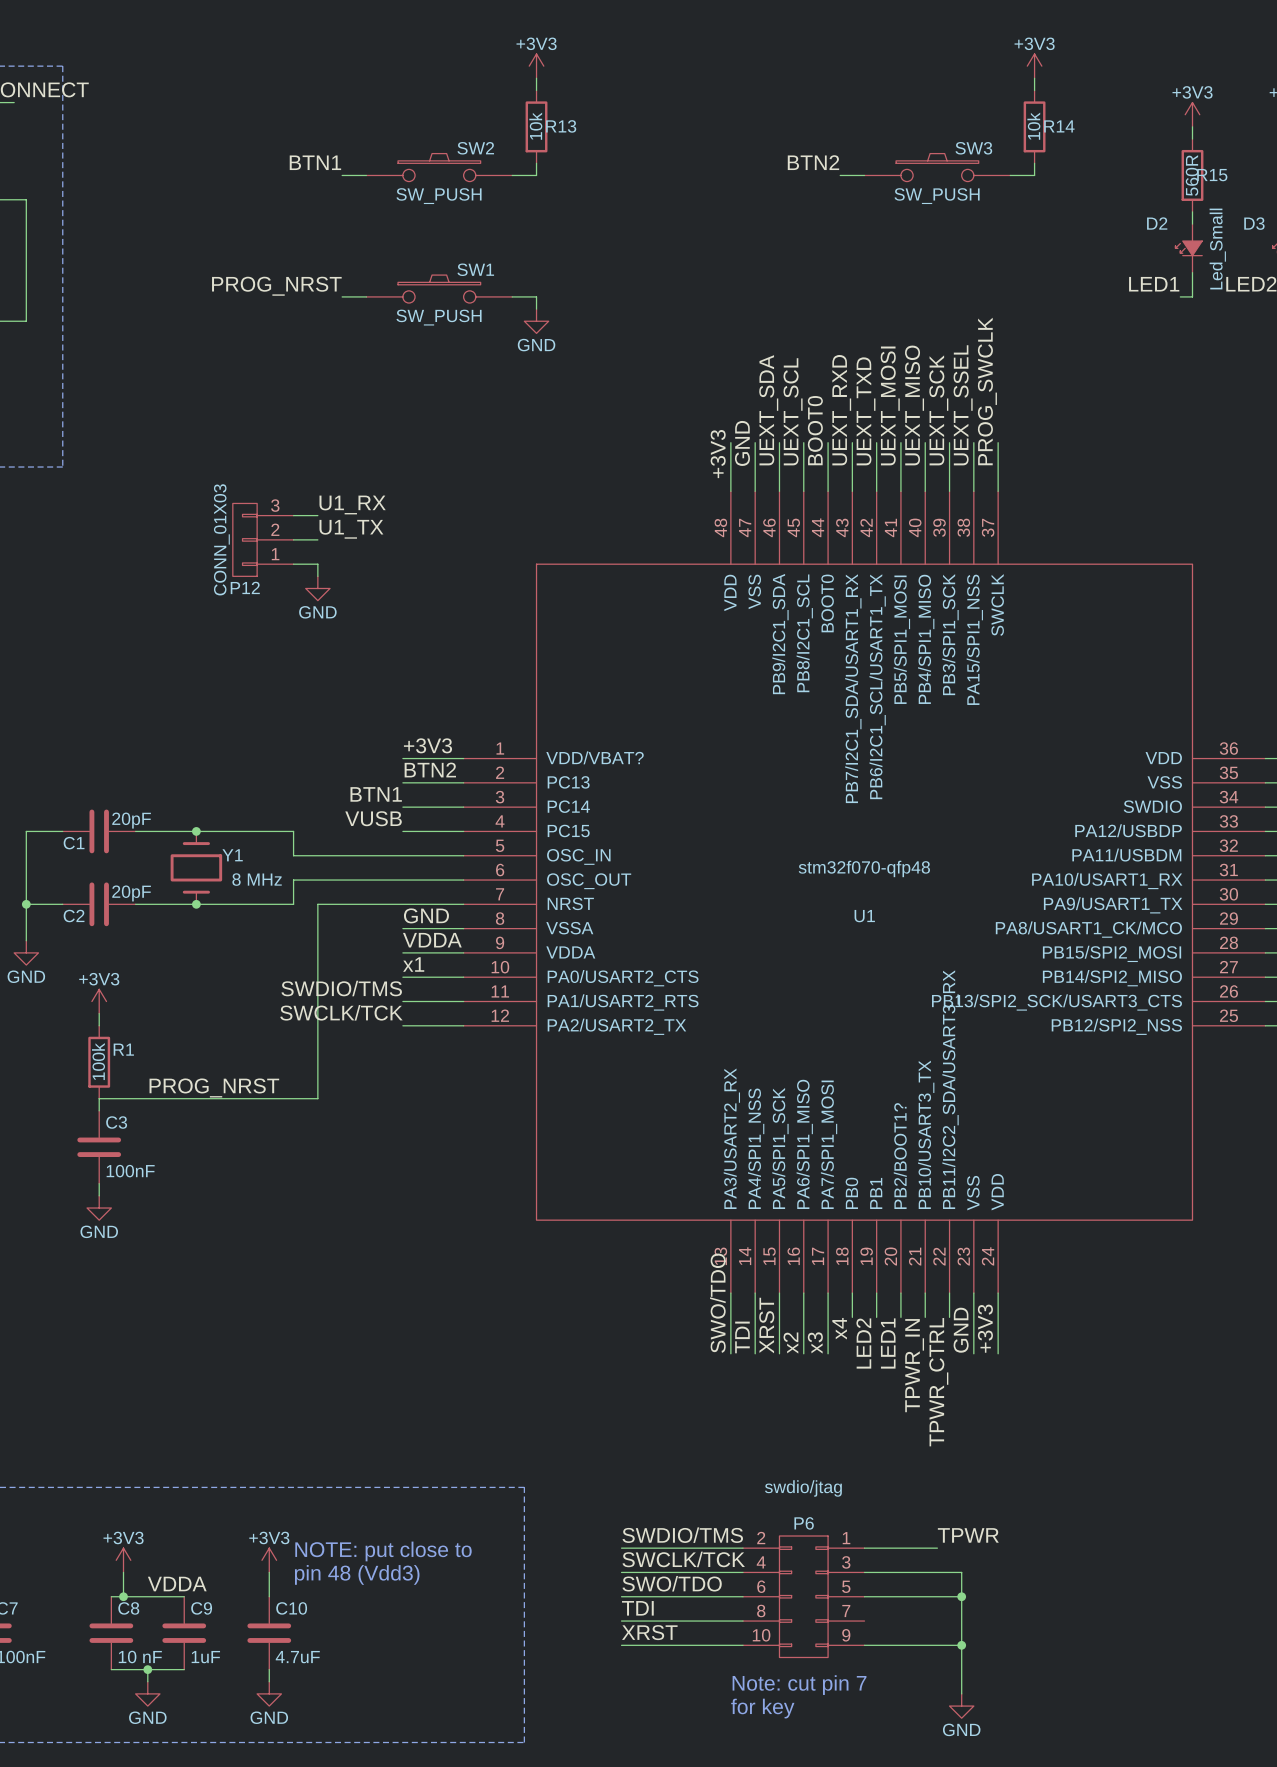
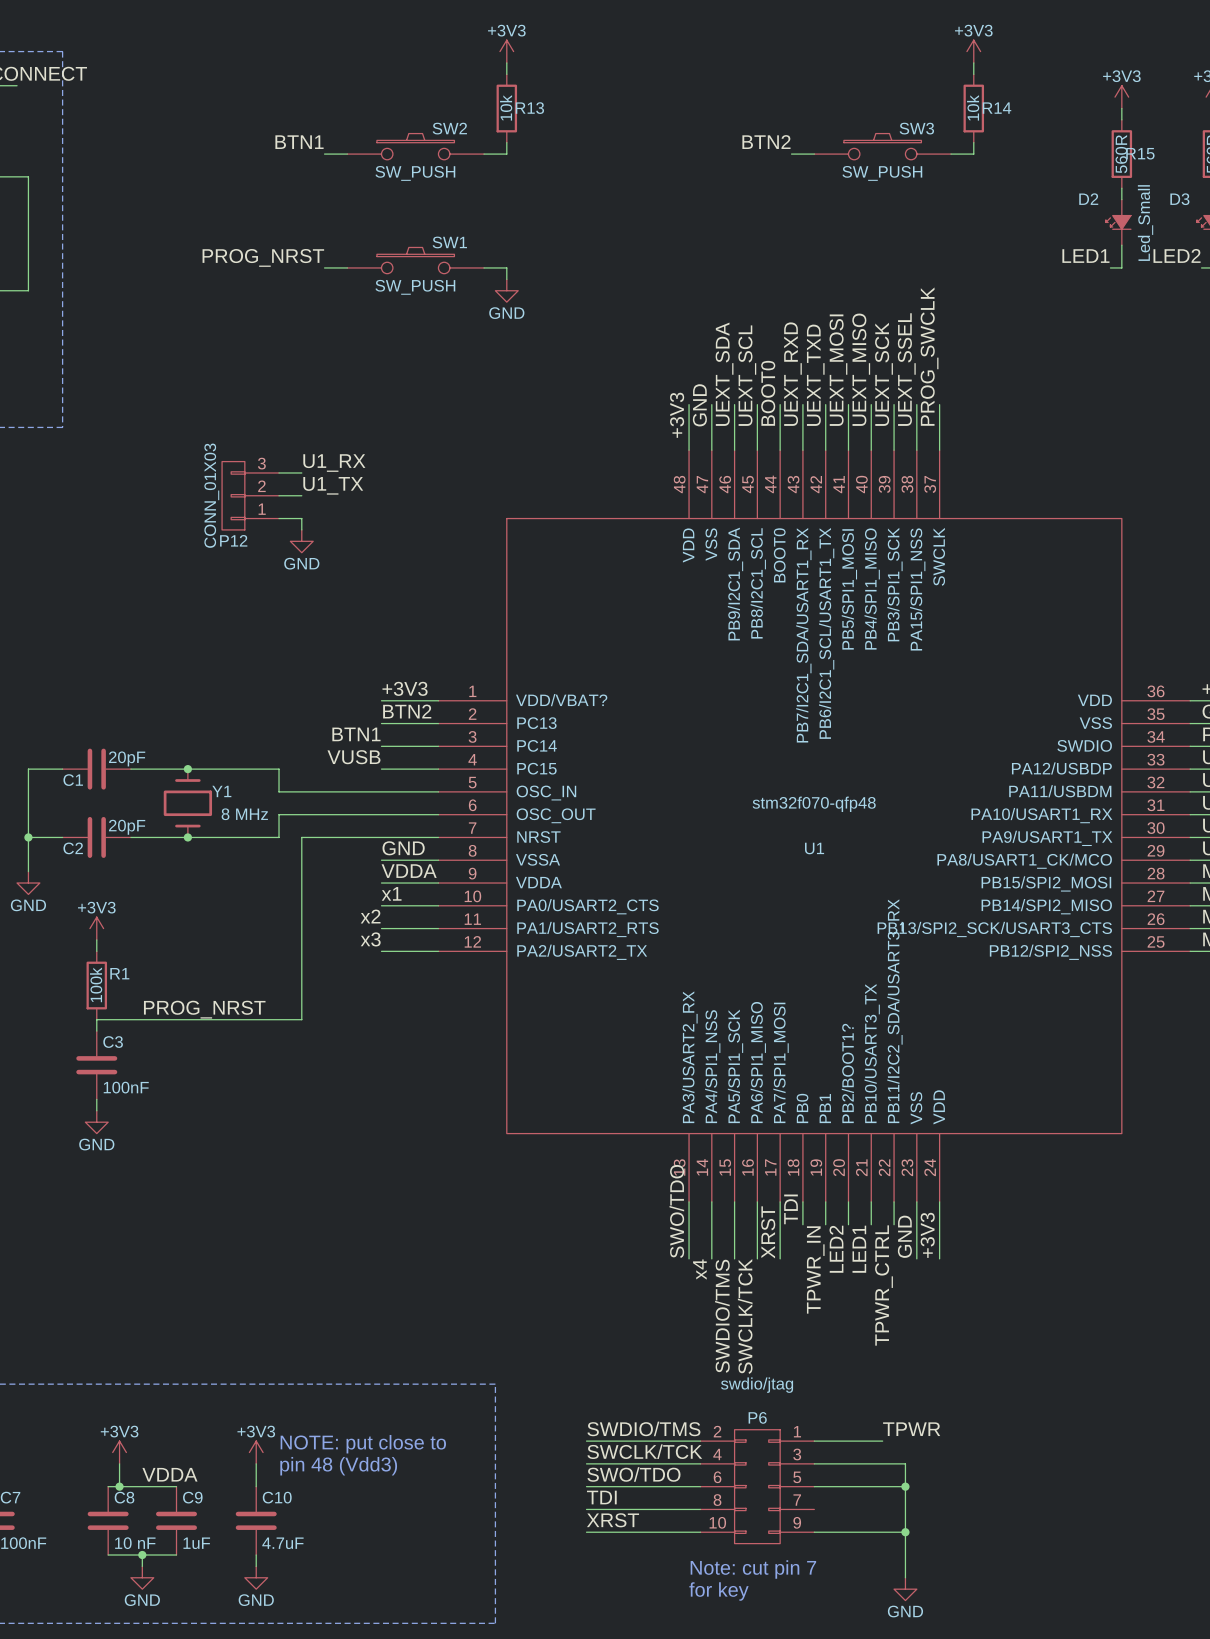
label: SWDIO/TMS (341, 988) -> x2 (370, 916)
label: SWCLK/TCK (341, 1012) -> x3 (370, 939)
label: XRST (766, 1325) -> SWDIO/TMS (722, 1316)
label: x4 (839, 1328) -> TDI (791, 1209)
label: TDI (742, 1337) -> x4 (699, 1269)
label: x3 (815, 1342) -> XRST (768, 1232)
label: x2 (790, 1343) -> SWCLK/TCK (745, 1316)
label: LED2 (863, 1343) -> TPWR_IN (815, 1269)
label: LED1 (888, 1343) -> LED2 (836, 1249)
label: TPWR_IN (914, 1365) -> LED1 (859, 1249)

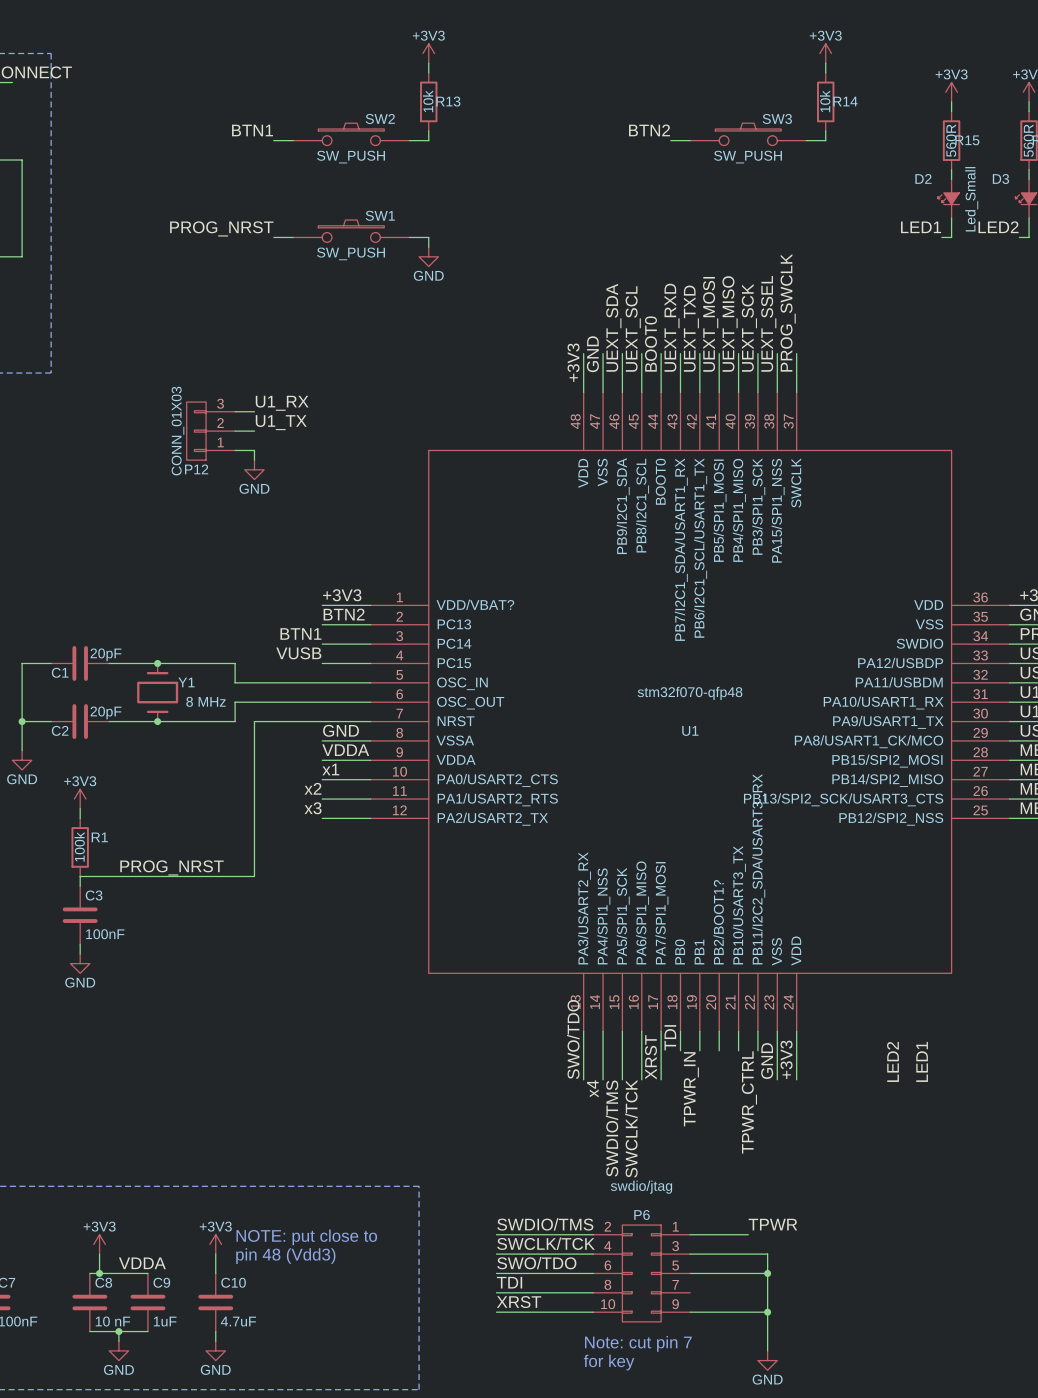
label: none -> LED1 (922, 1061)
label position: LED2 (836, 1249) -> LED2 (892, 1061)
label: LED1 (859, 1249) -> none

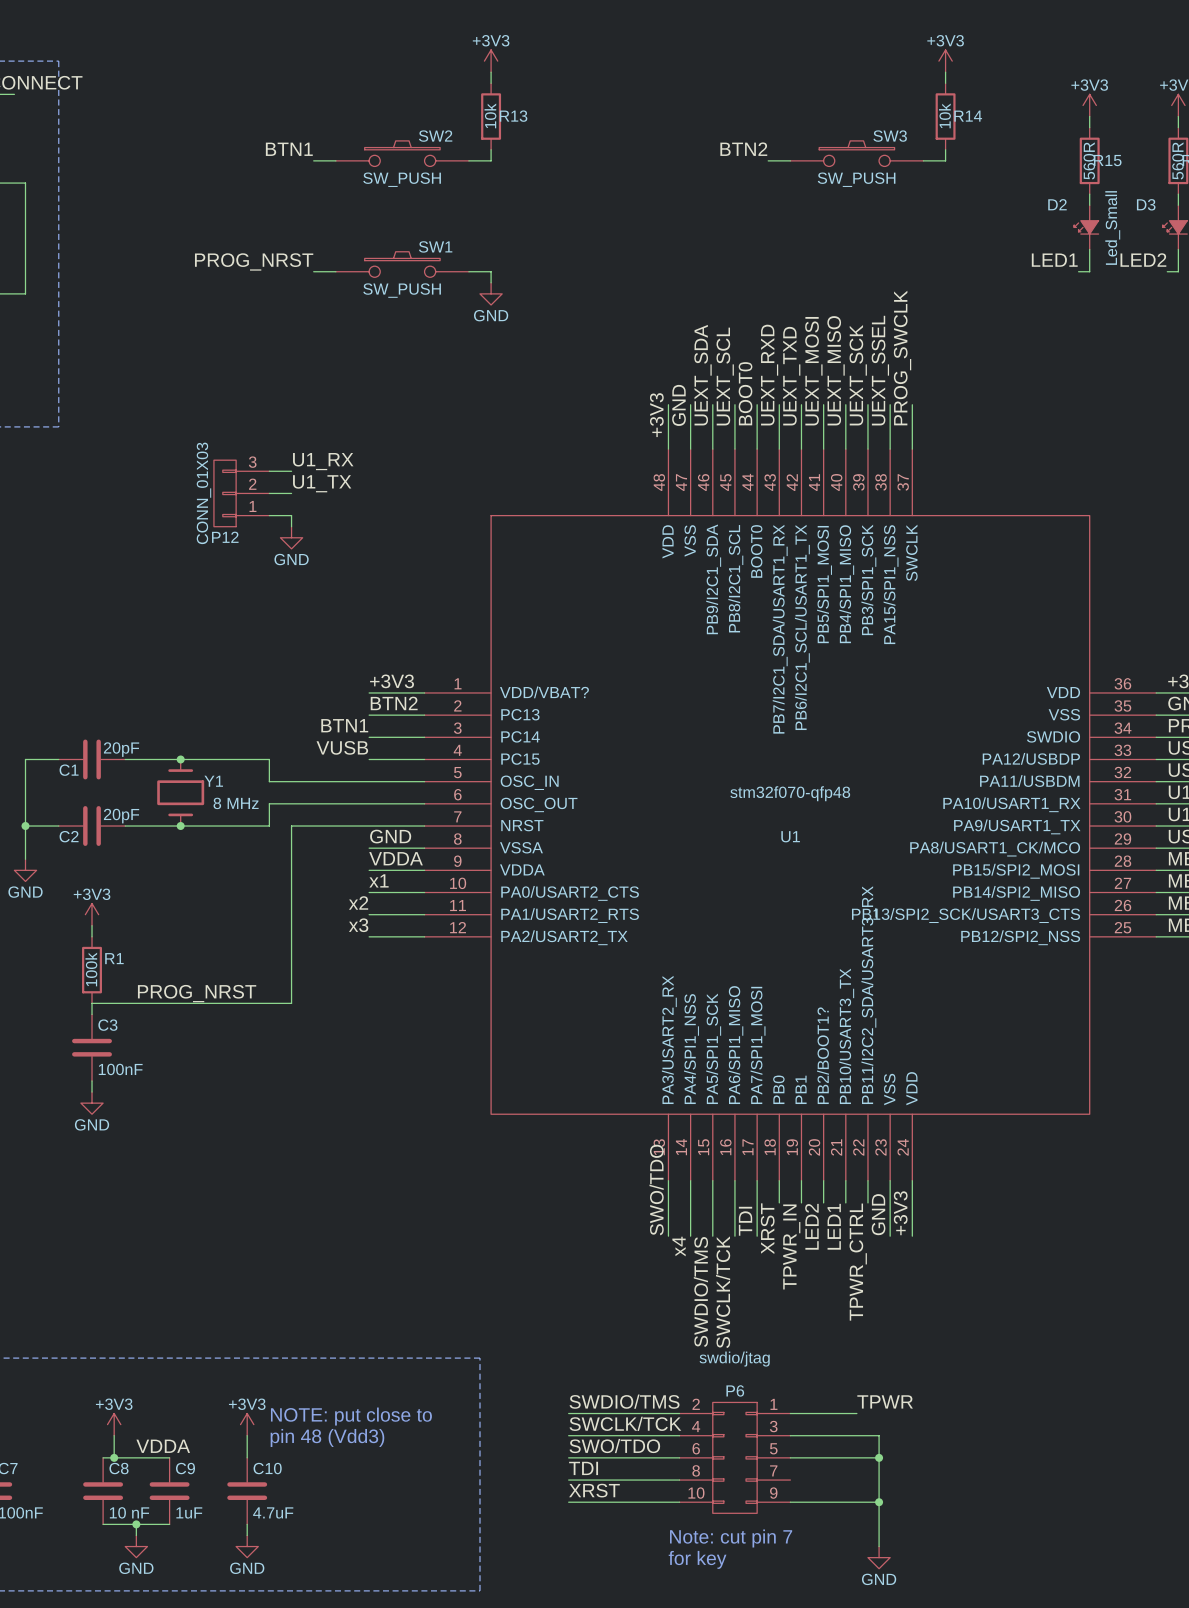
label: TDI (670, 1037) -> XRST (767, 1228)
label: XRST (650, 1057) -> TDI (745, 1221)
label position: LED2 (892, 1061) -> LED2 (811, 1226)
label: LED1 (922, 1061) -> none
label: none -> LED1 (834, 1226)

